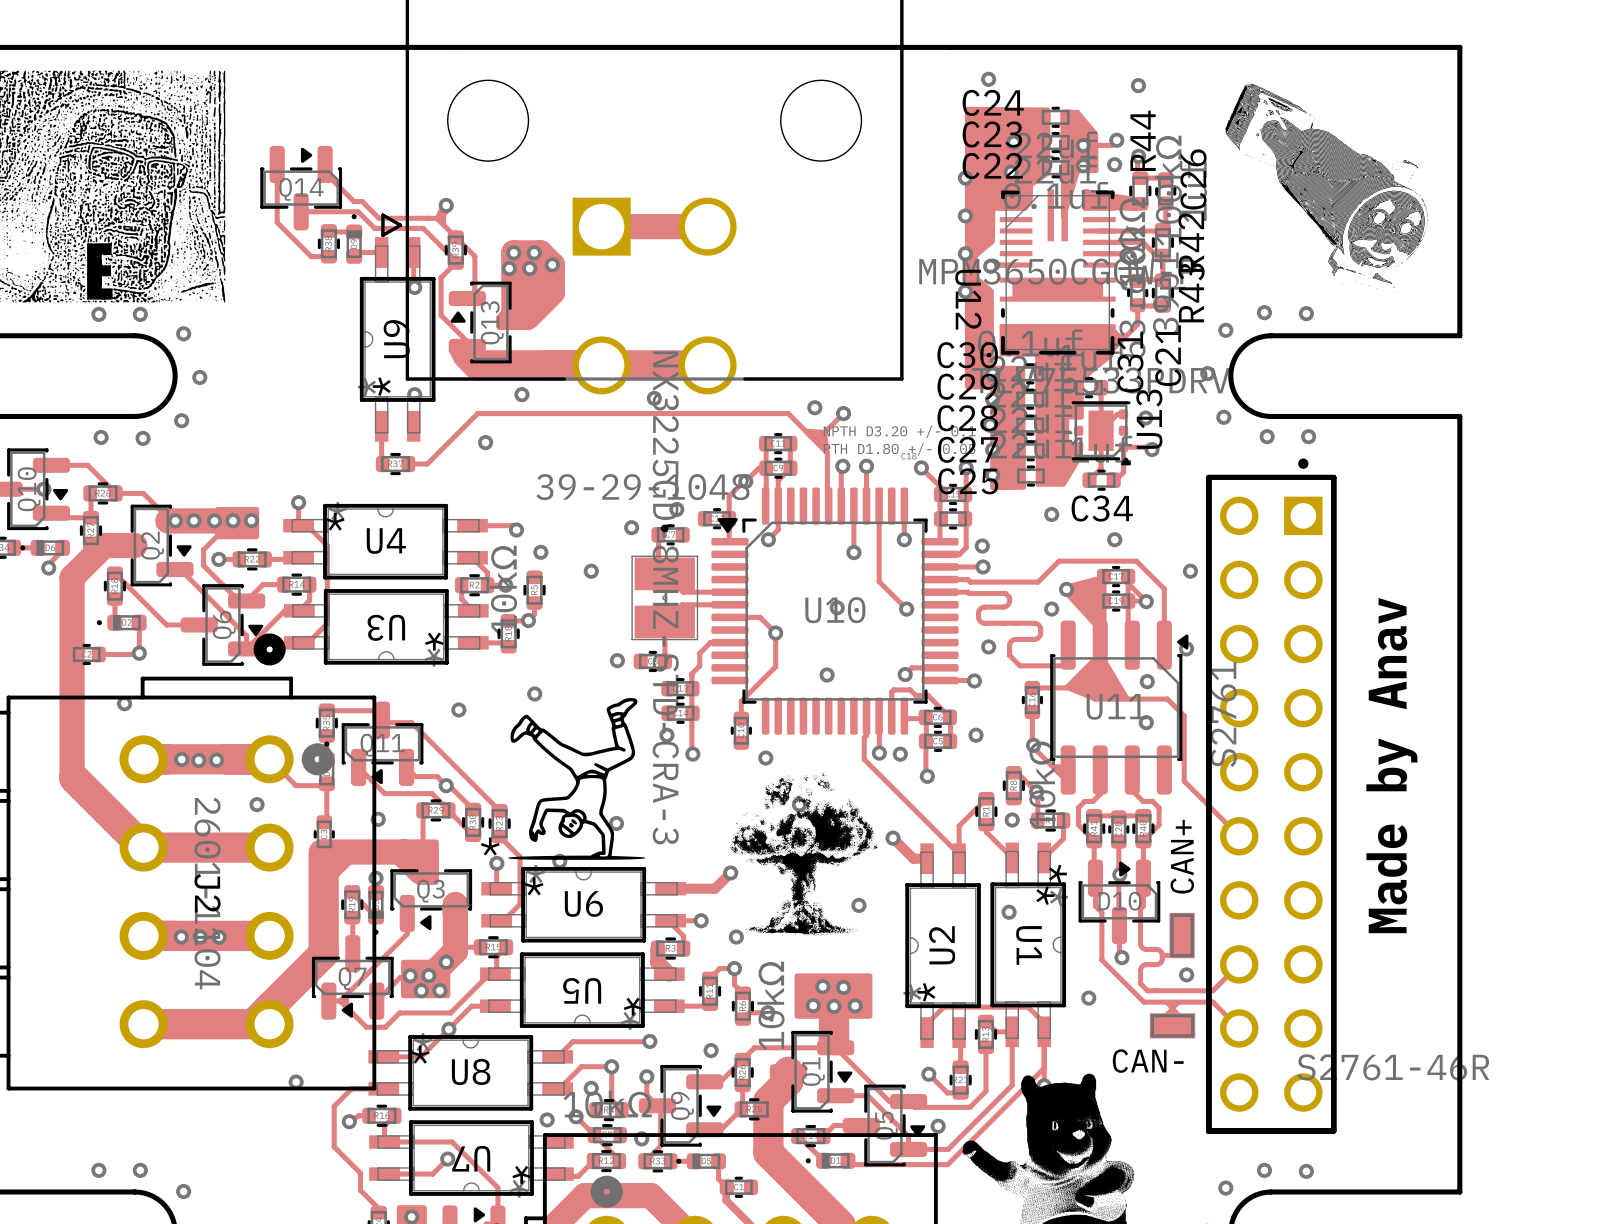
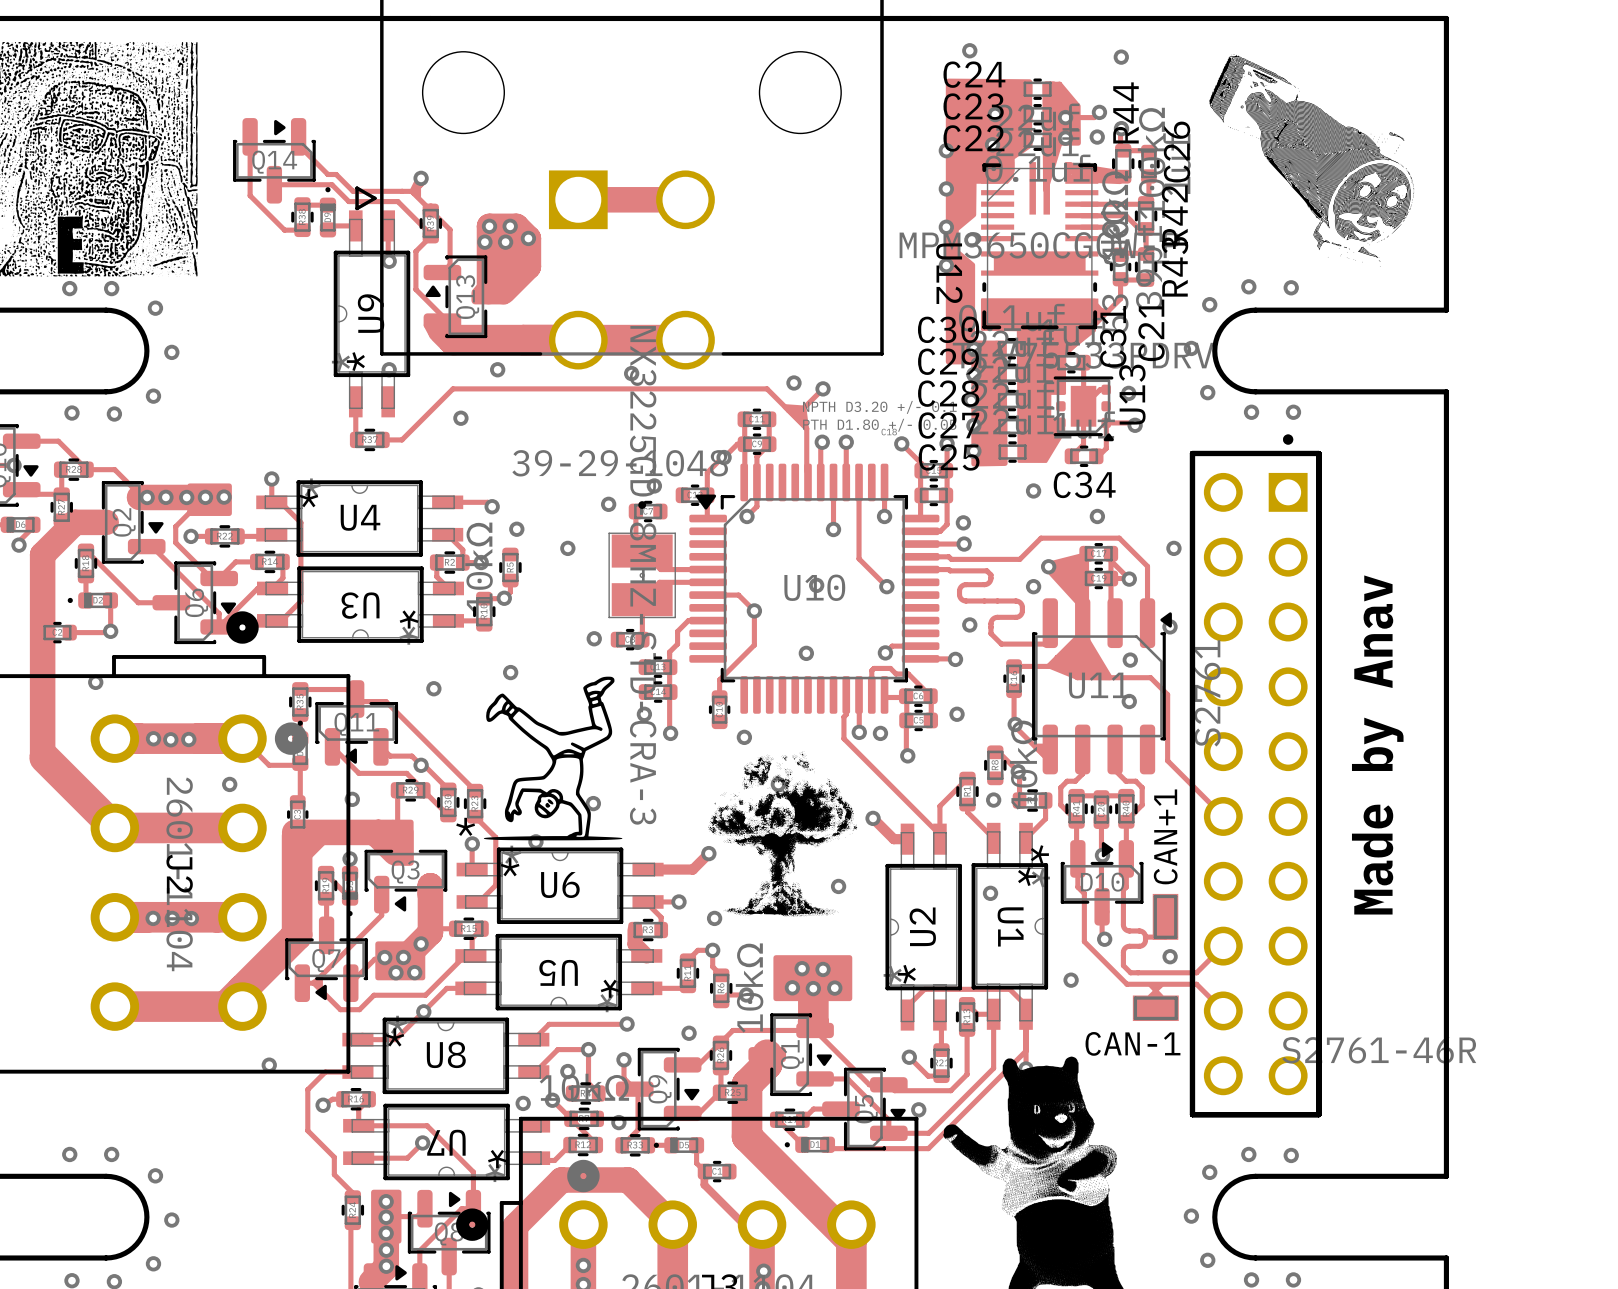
CAN+ name: CAN+ (1182, 856) -> CAN+1 (1165, 836)
CAN- name: CAN- (1148, 1061) -> CAN-1 (1132, 1043)

